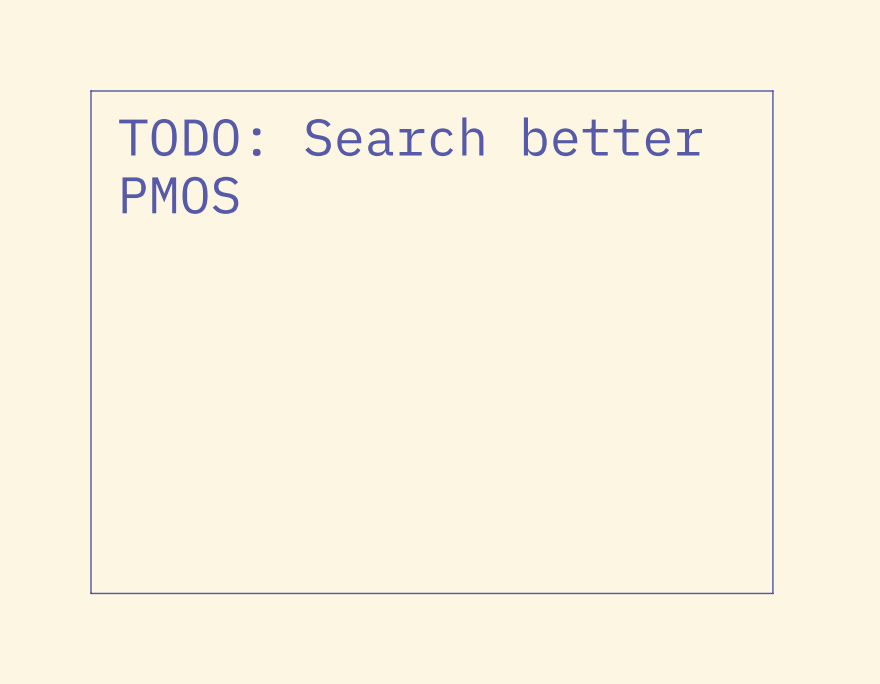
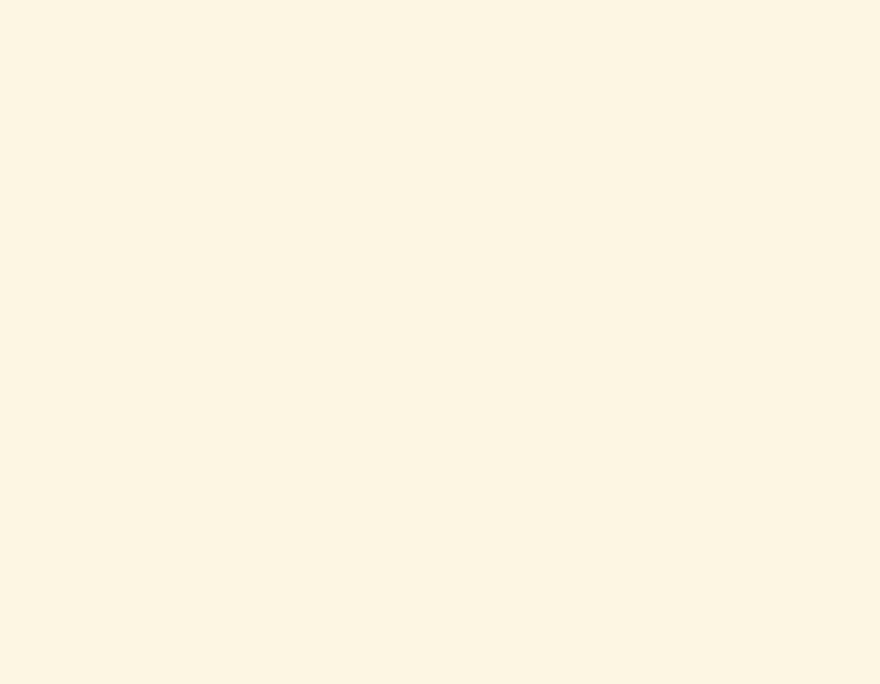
line: (90, 90) (772, 90) (772, 593) (90, 593) (90, 90) -> none
text: TODO: Search better (410, 136) -> none
text: PMOS (180, 195) -> none

